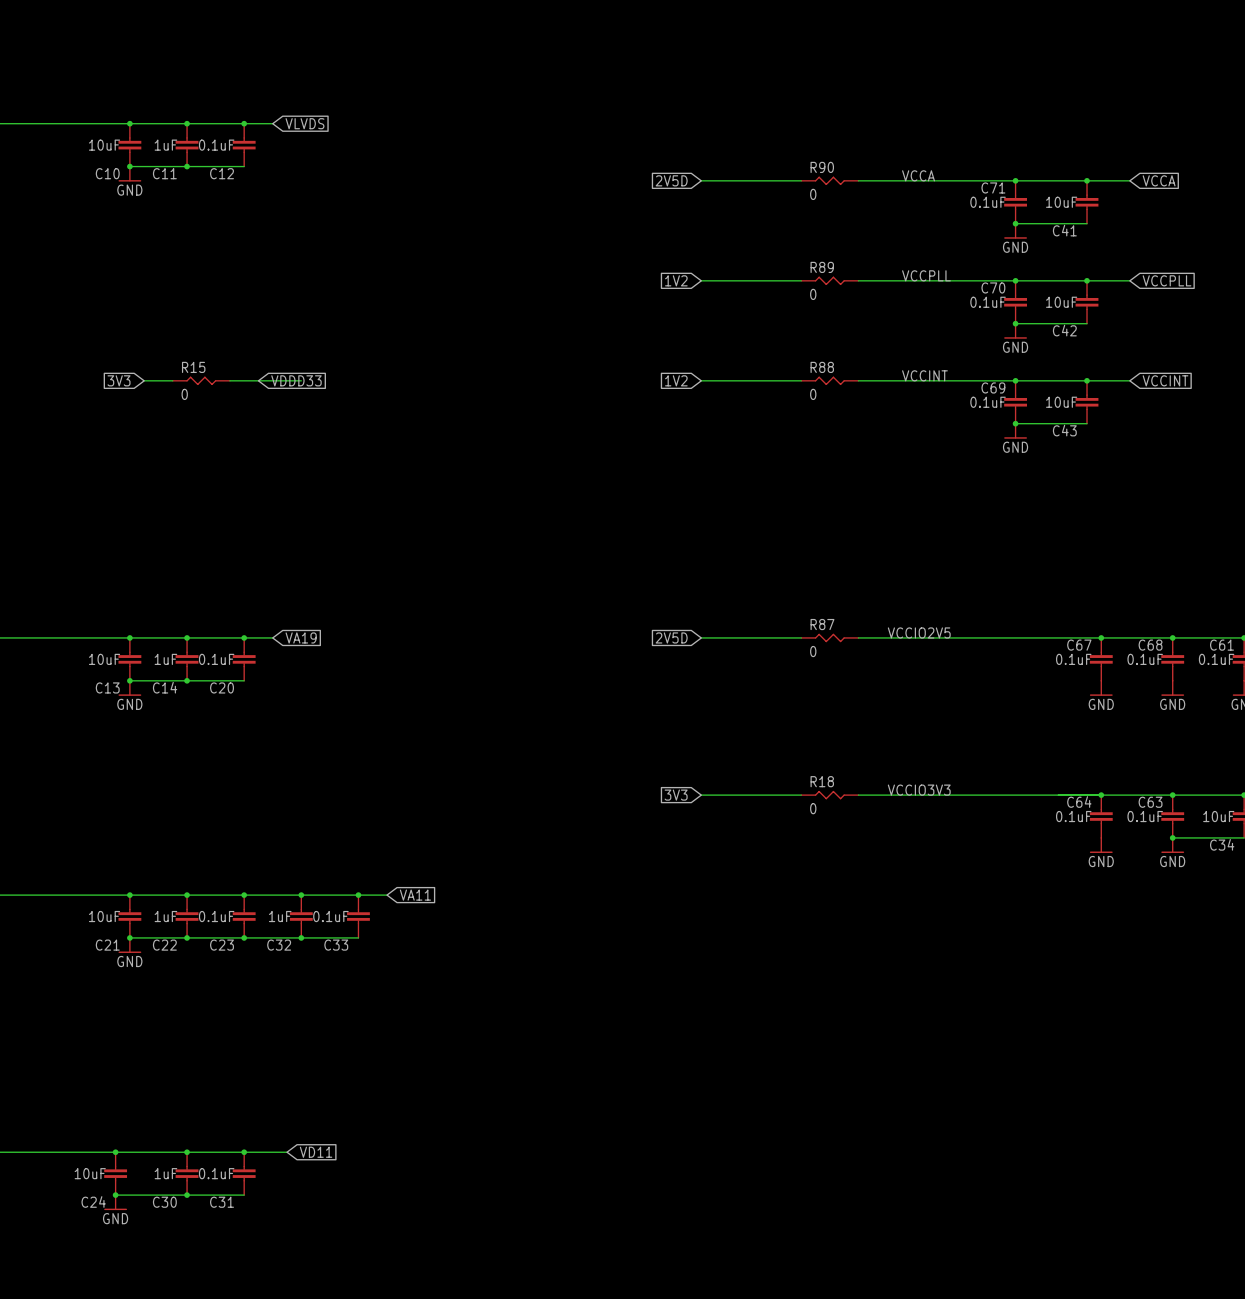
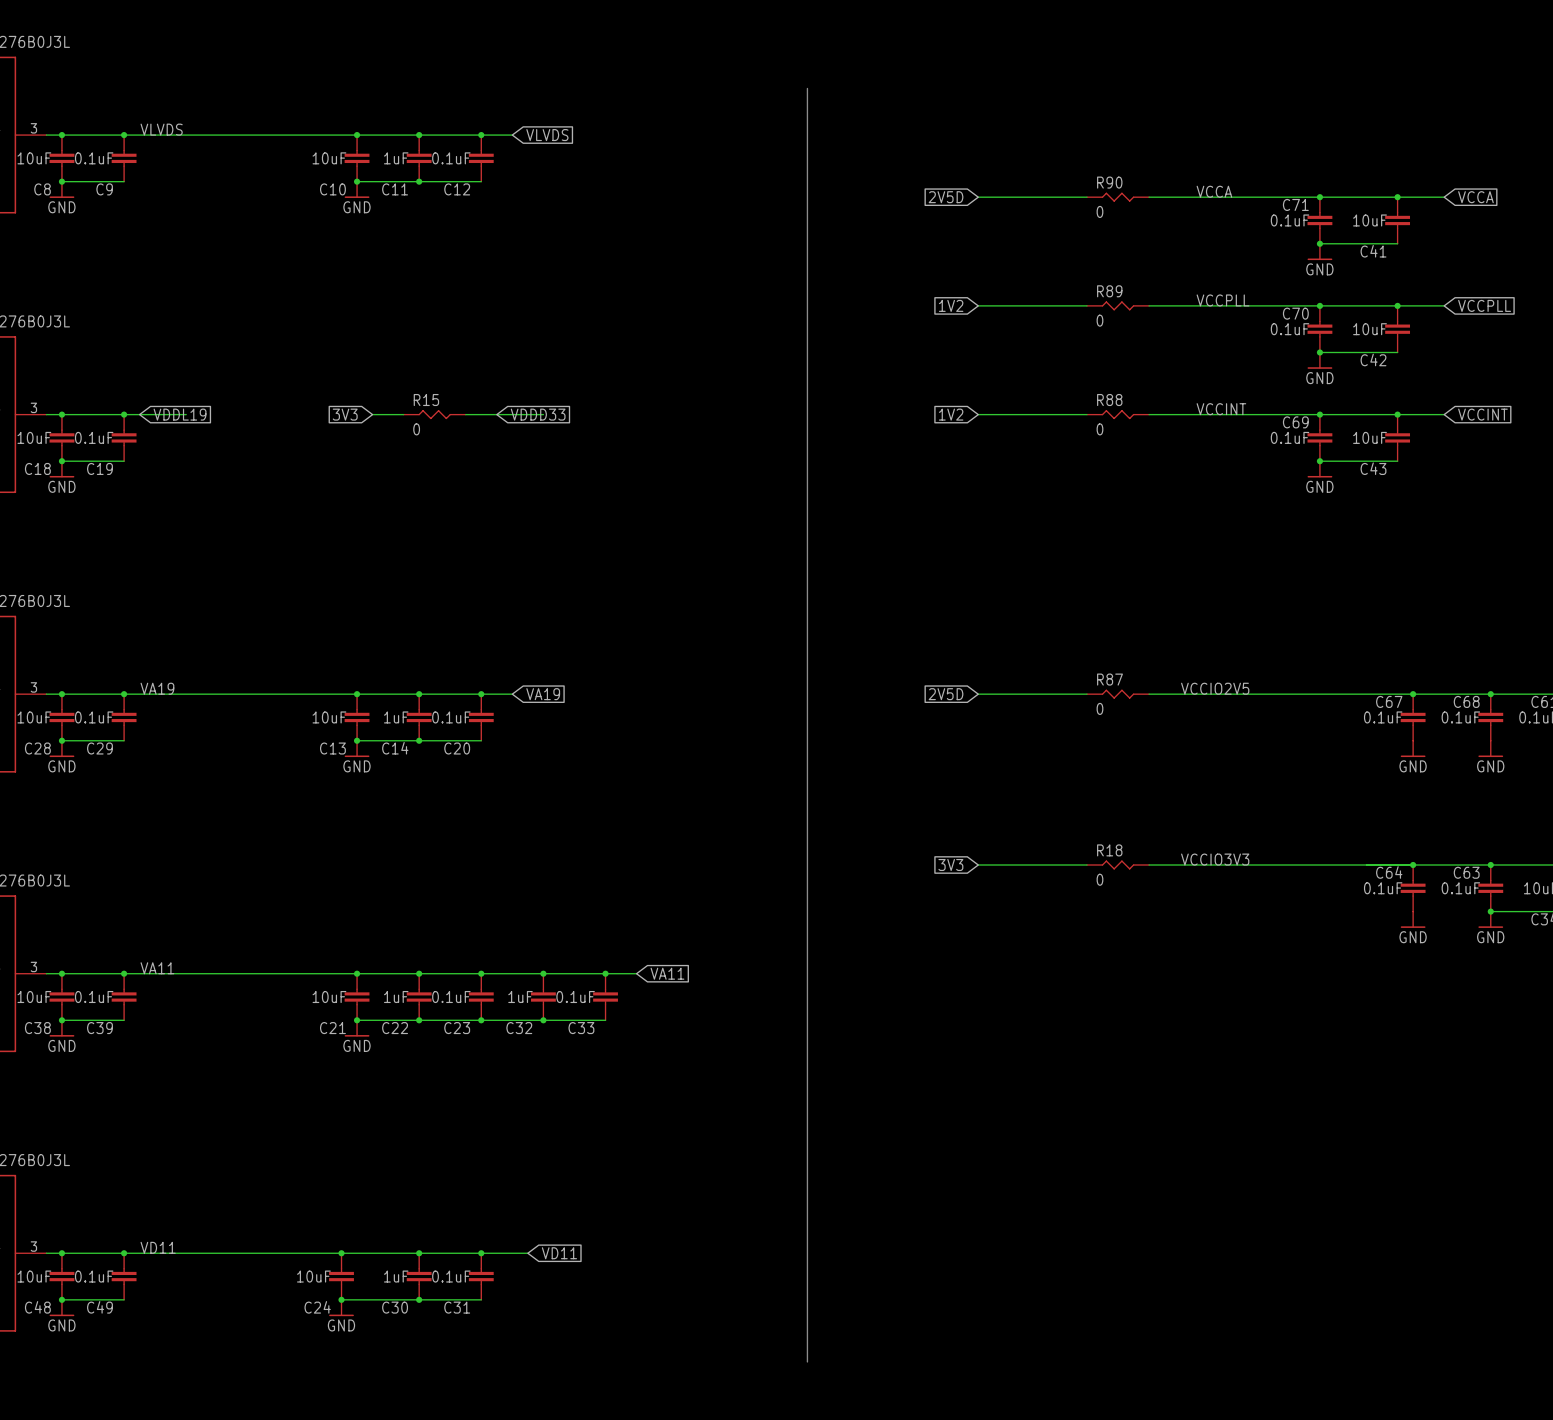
line: none -> (807, 88) (807, 1361)

